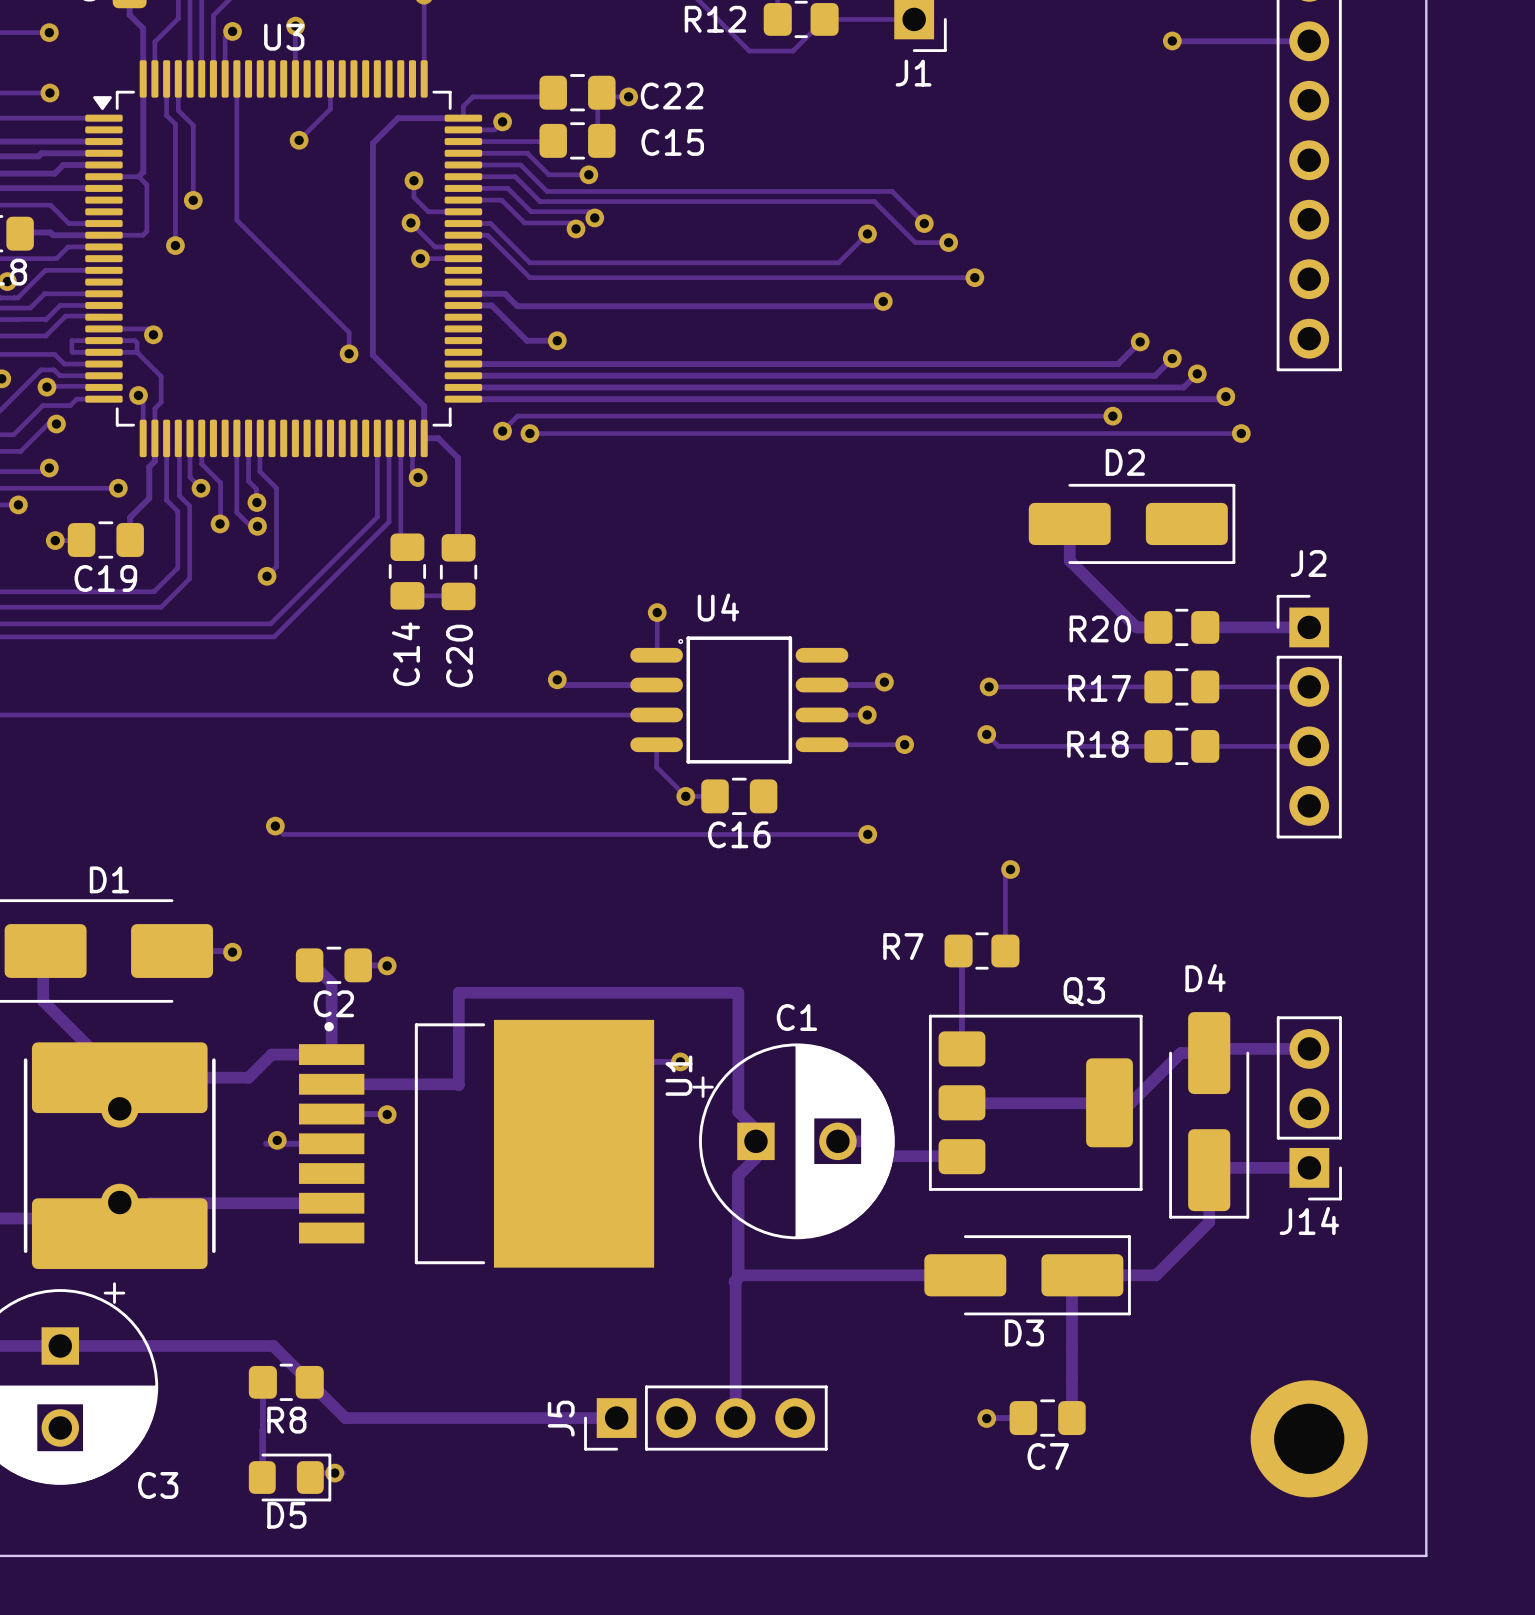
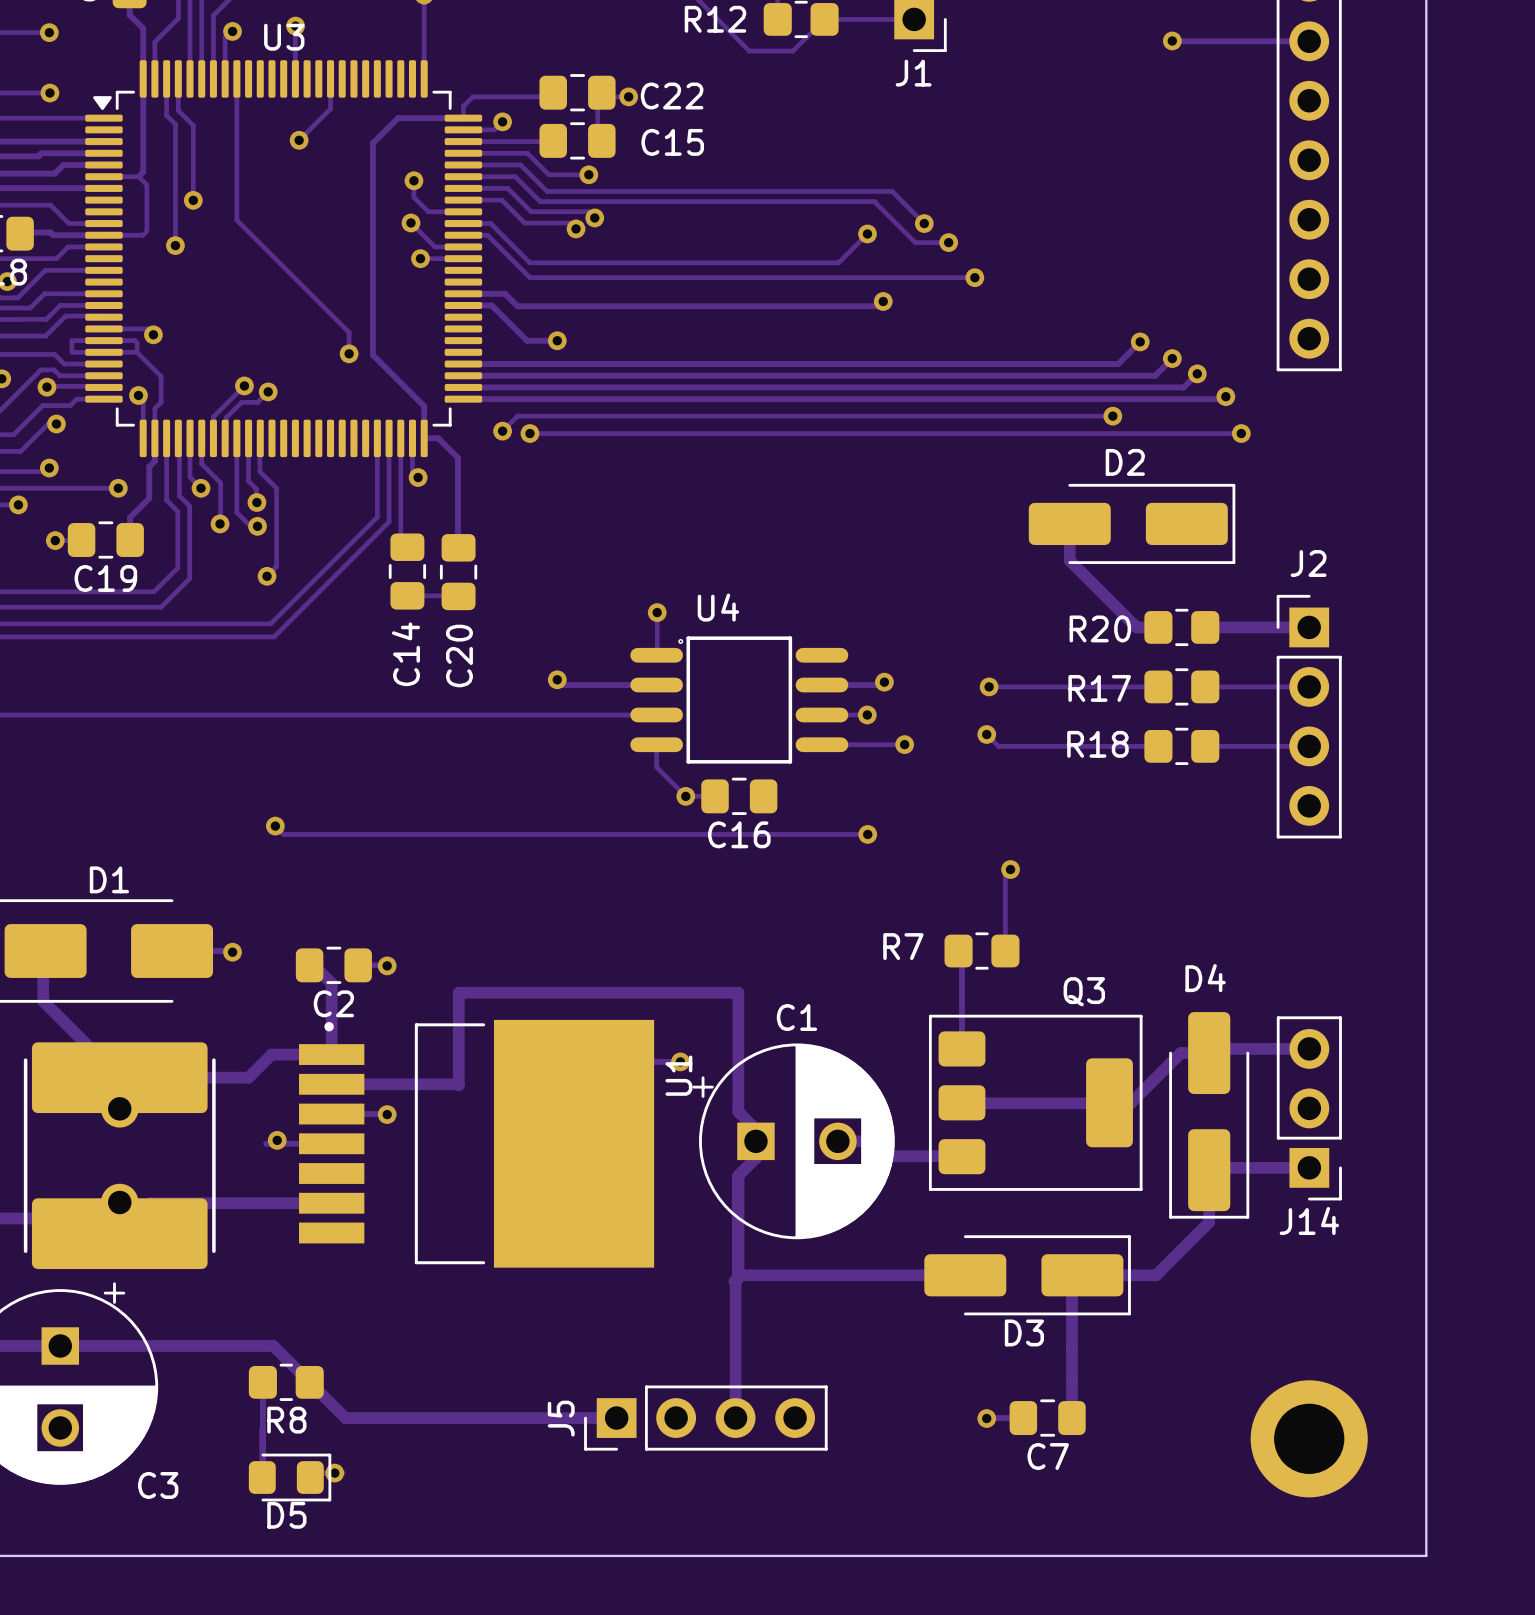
track: none -> (244, 385) (213, 416) (213, 438)
via: none -> (244, 385)
track: none -> (268, 391) (257, 402) (241, 402) (226, 417) (226, 433)
via: none -> (268, 391)

